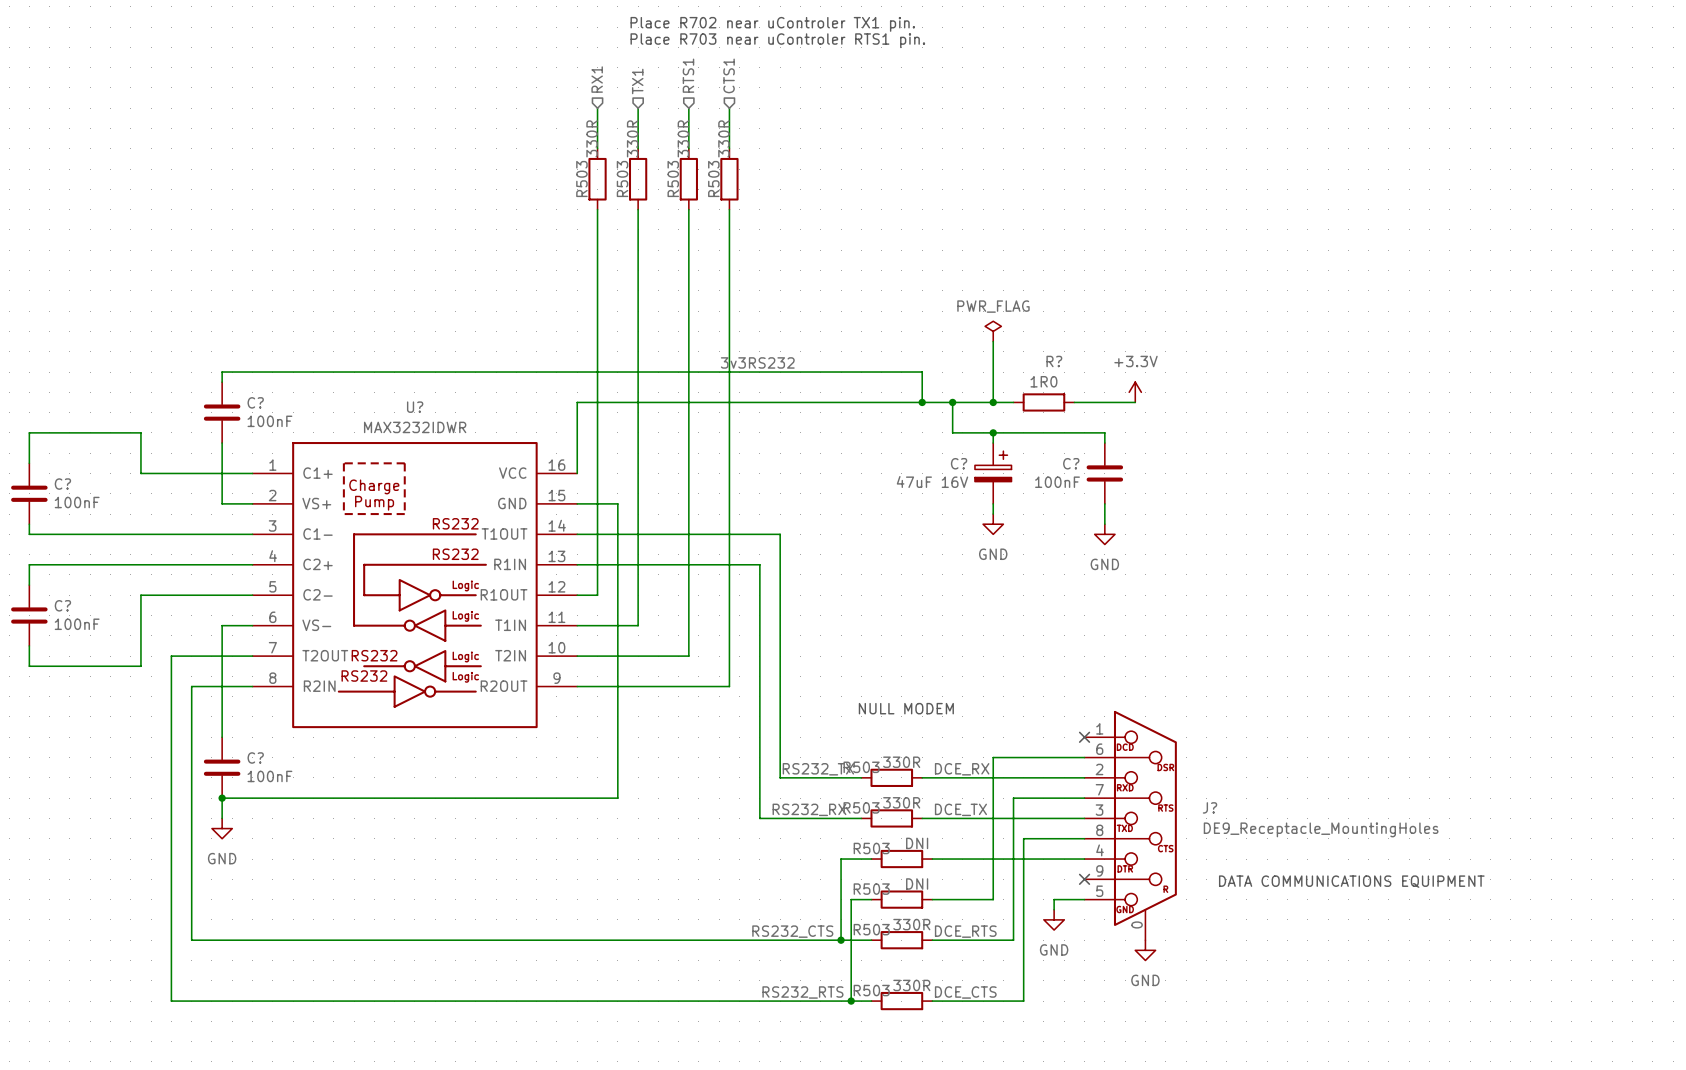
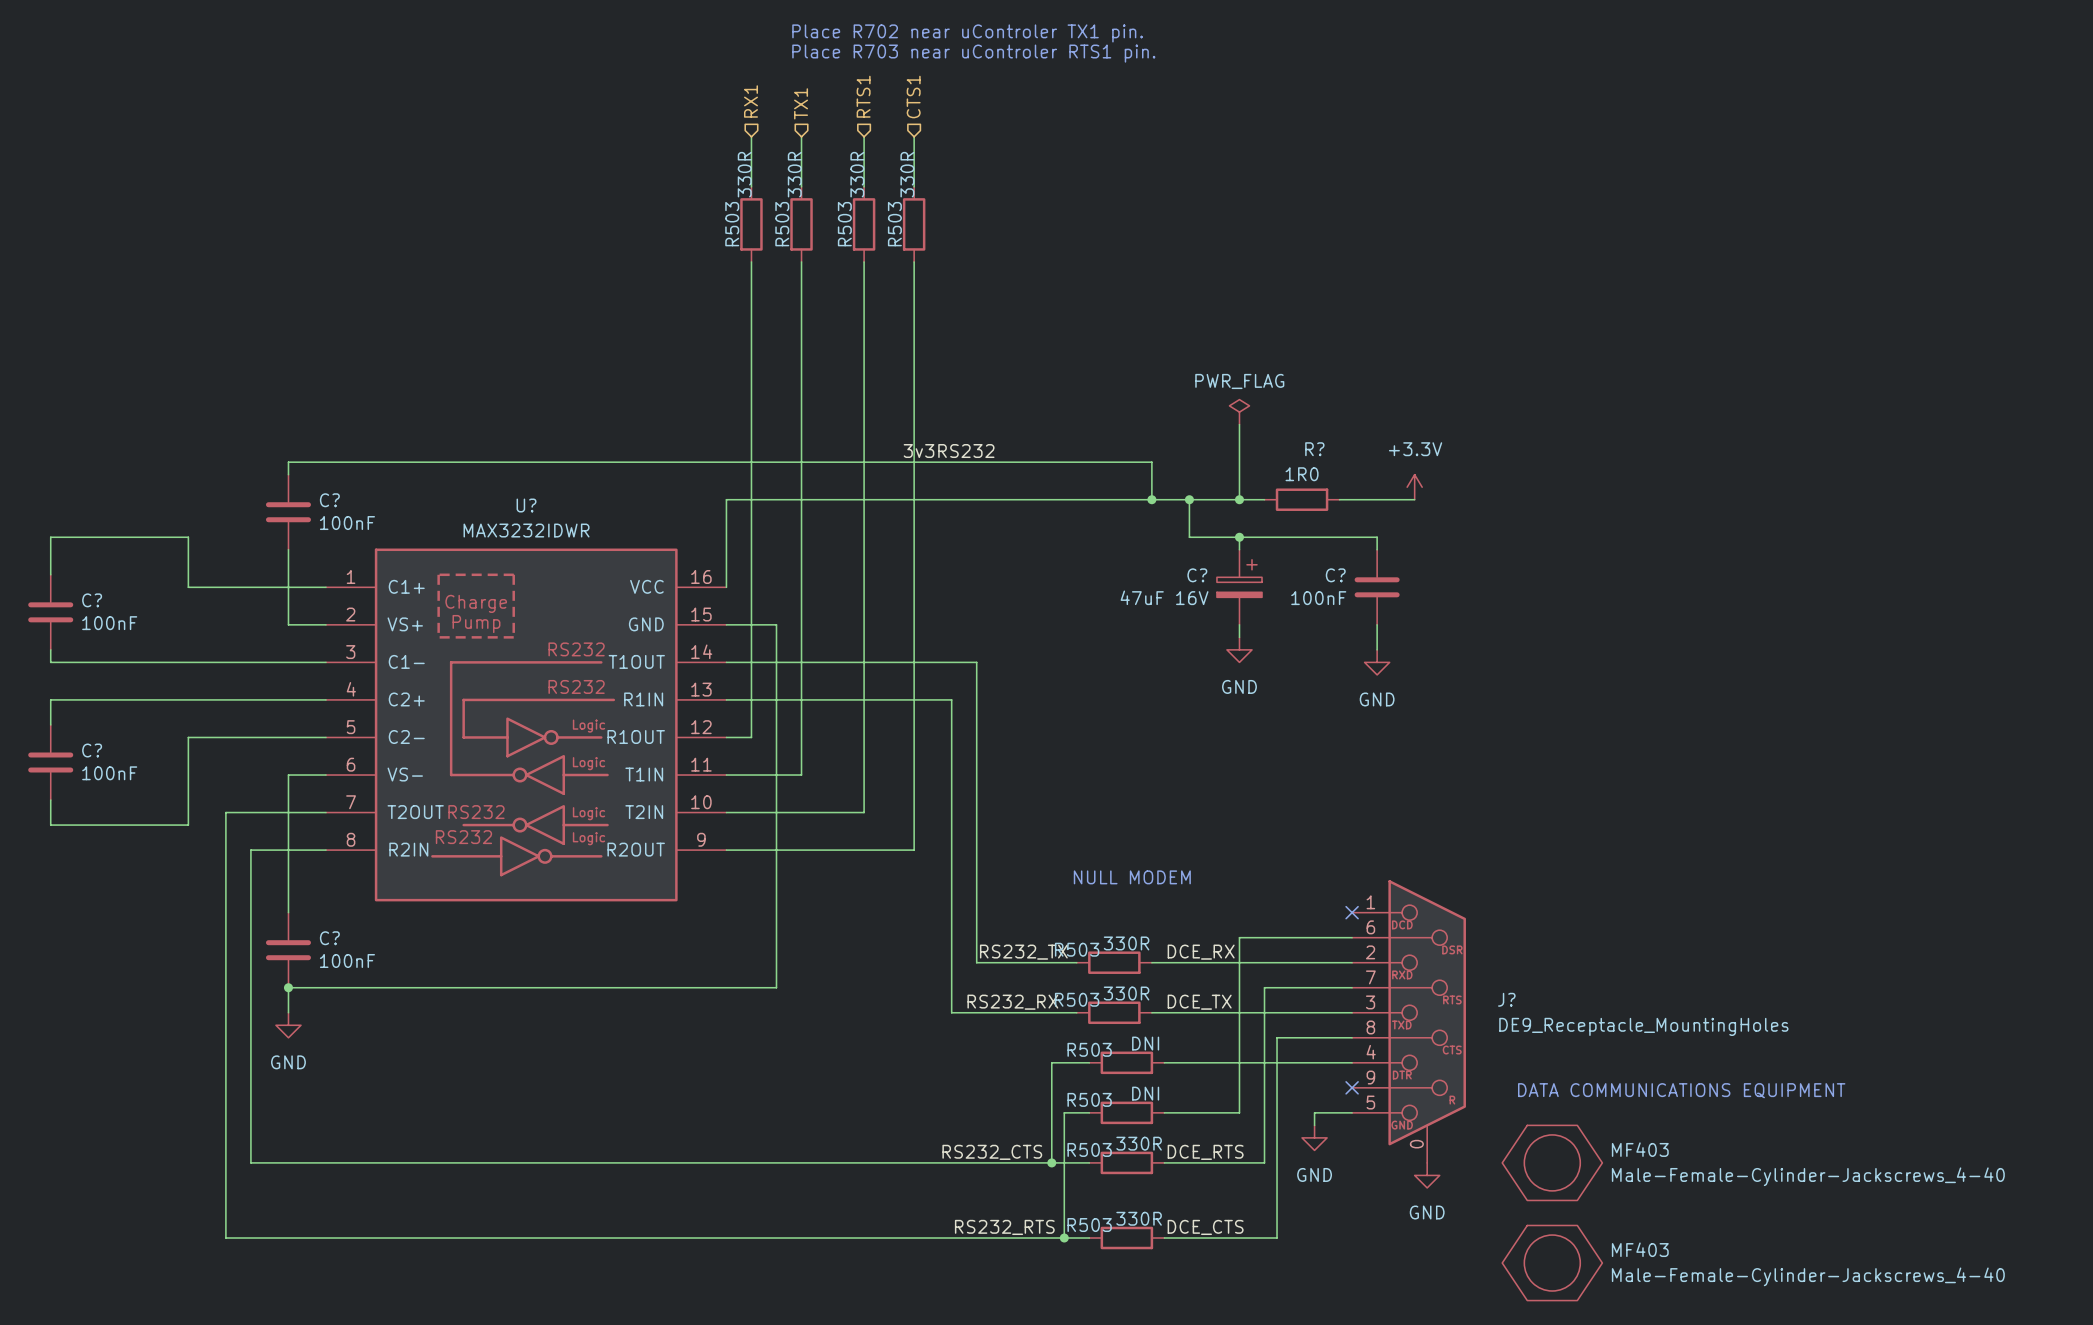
MF403: none -> Male-Female-Cylinder-Jackscrews_4-40 (1552, 1162)
MF403: none -> Male-Female-Cylinder-Jackscrews_4-40 (1552, 1263)

